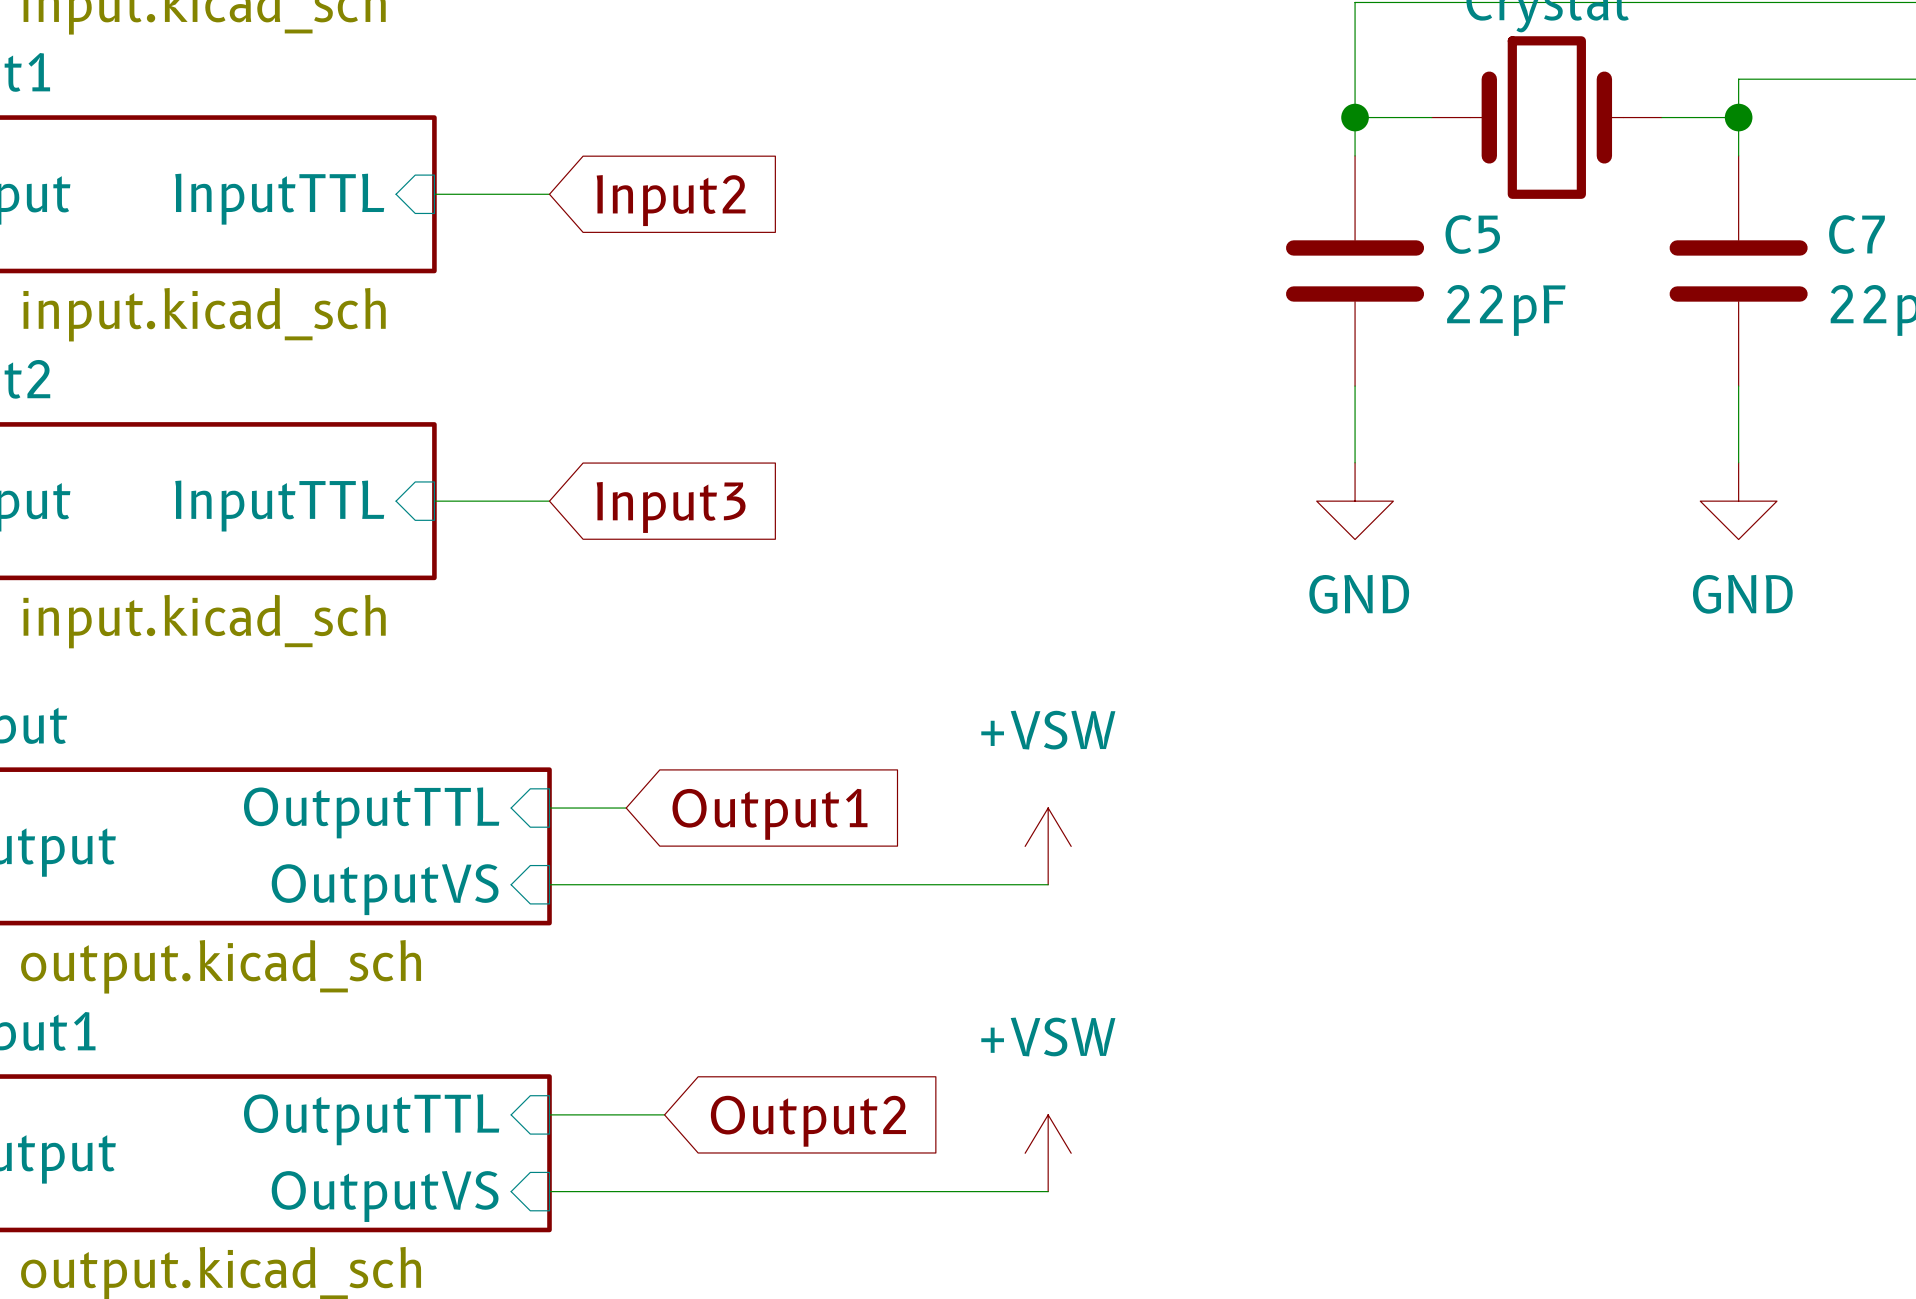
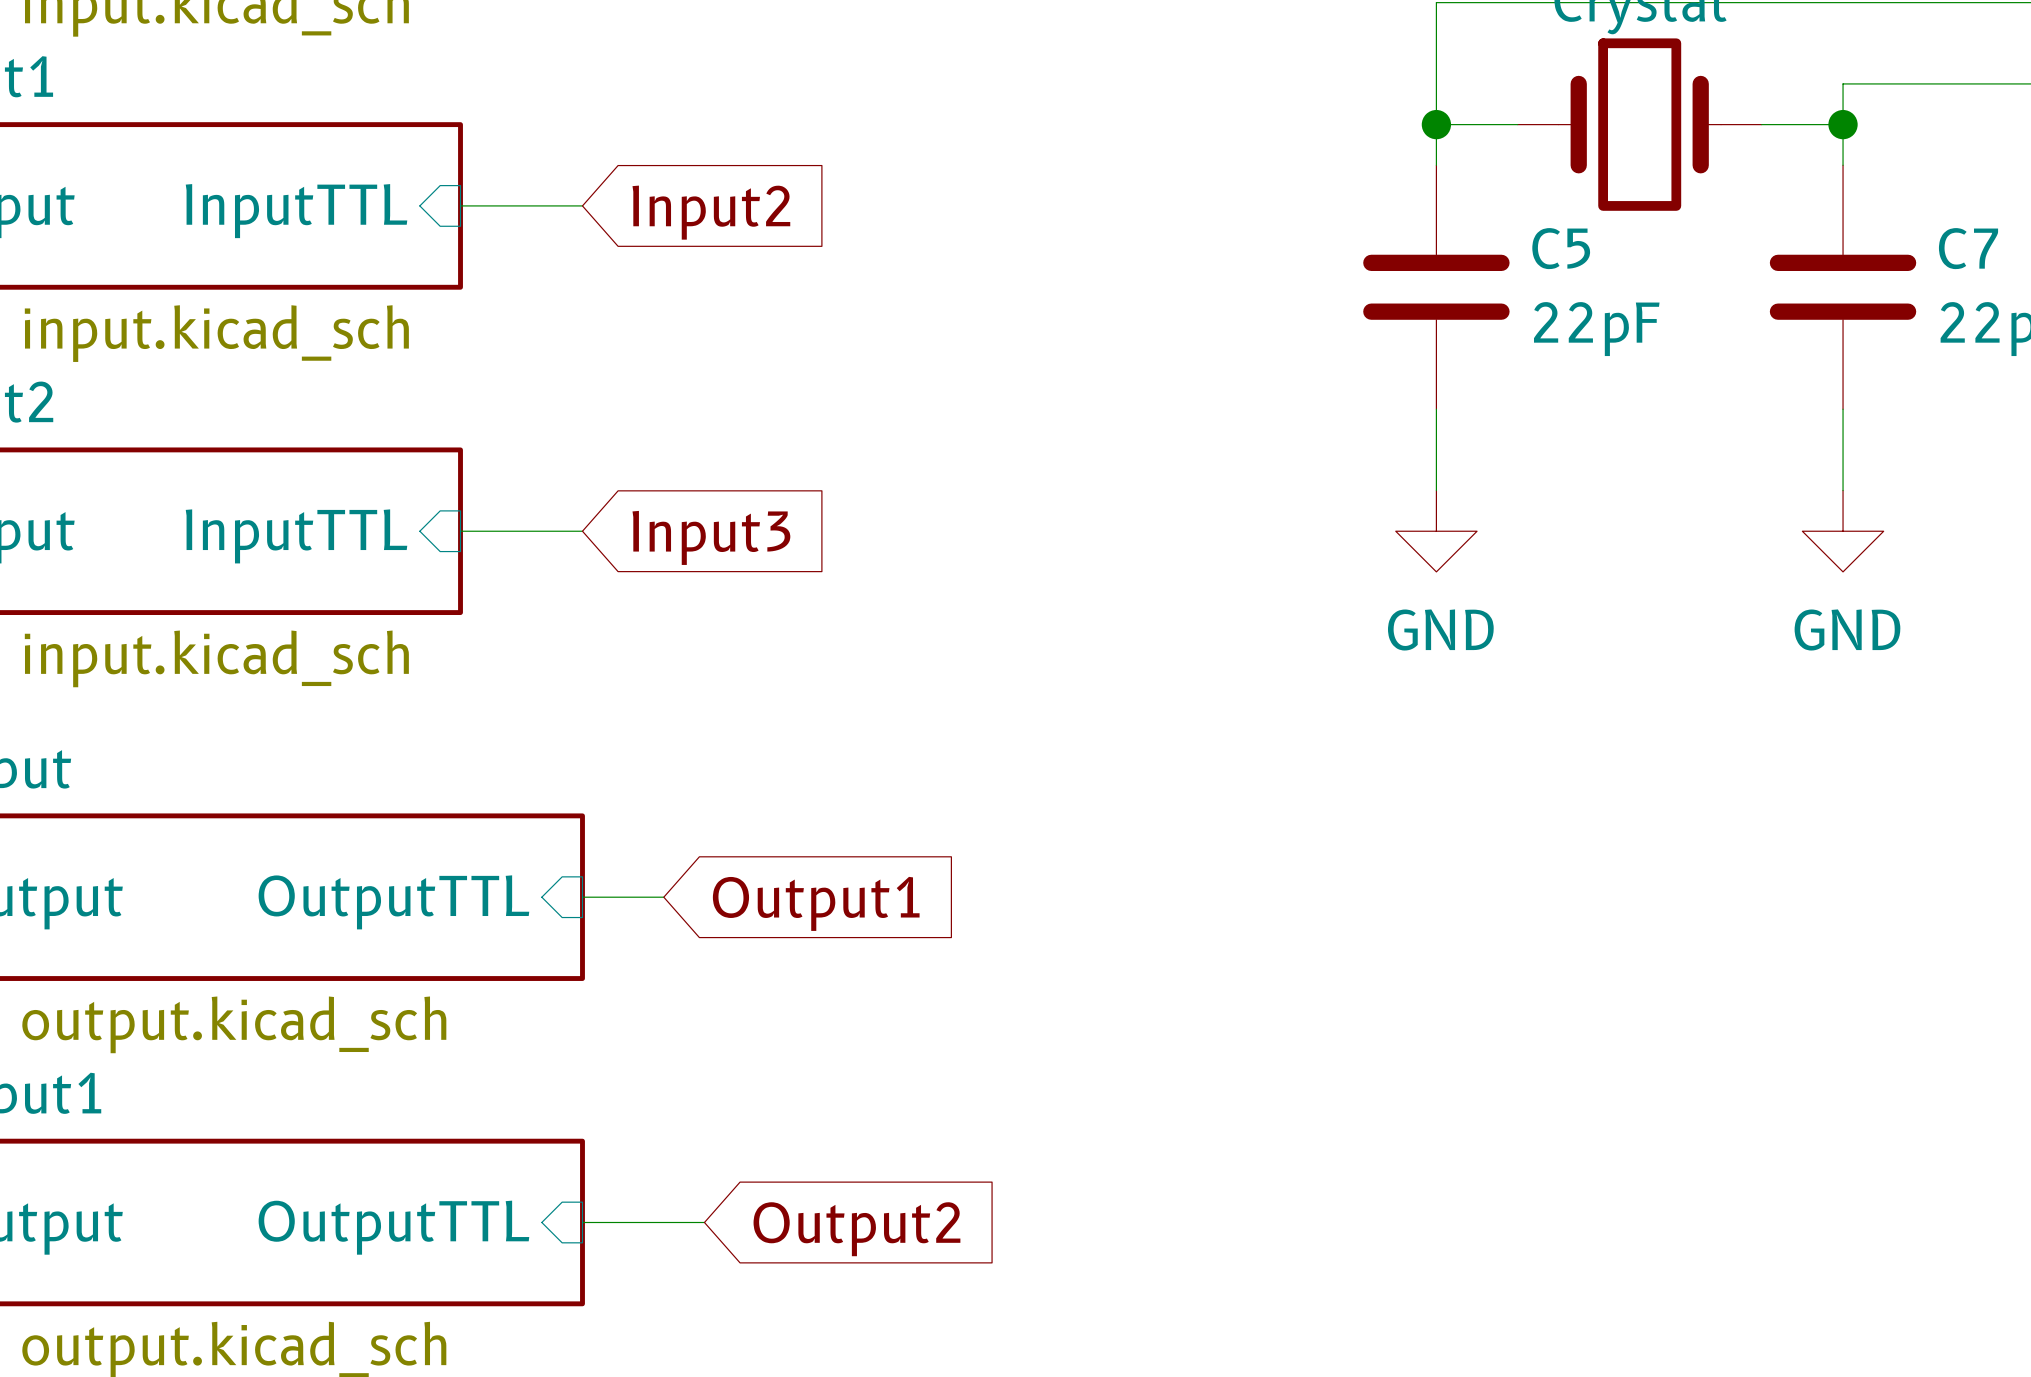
wire: (549, 808) (626, 808) -> (582, 897) (663, 897)
sheet pin position: OutputTTL (371, 812) -> OutputTTL (393, 902)
global label position: Output1 (769, 814) -> Output1 (816, 903)
power symbol: +VSW (1048, 846) -> none
wire: (549, 884) (1048, 884) -> none
sheet pin: OutputVS (385, 889) -> none
wire: (549, 1114) (664, 1114) -> (582, 1222) (704, 1222)
sheet pin position: OutputTTL (371, 1119) -> OutputTTL (393, 1227)
global label position: Output2 (808, 1121) -> Output2 (856, 1229)
power symbol: +VSW (1048, 1153) -> none
wire: (549, 1191) (1048, 1191) -> none
sheet pin: OutputVS (385, 1196) -> none

